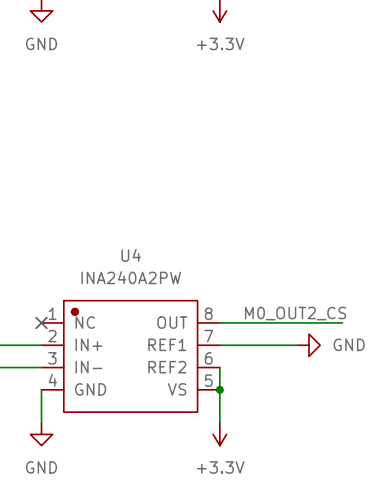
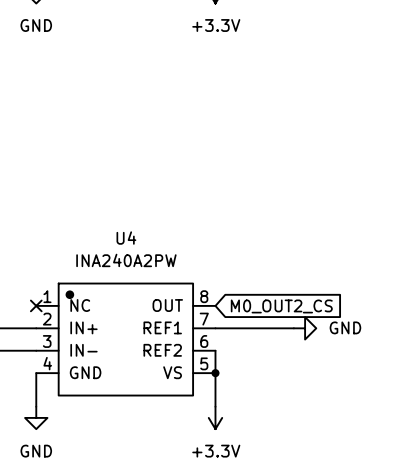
label: M0_OUT2_CS (295, 313) -> none
wire: (219, 322) (342, 322) -> none
global label: none -> M0_OUT2_CS (281, 306)

